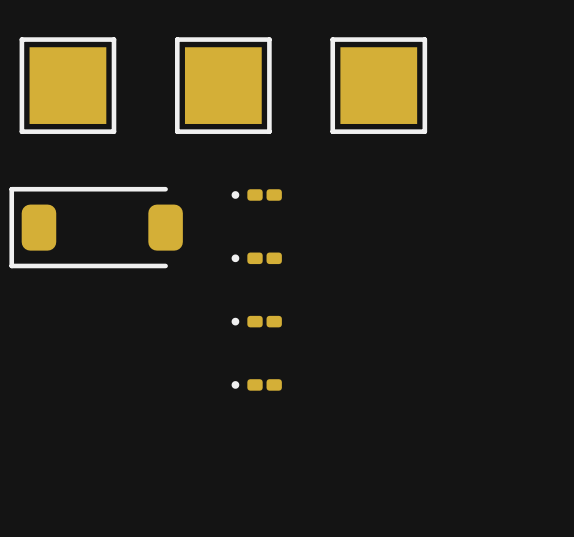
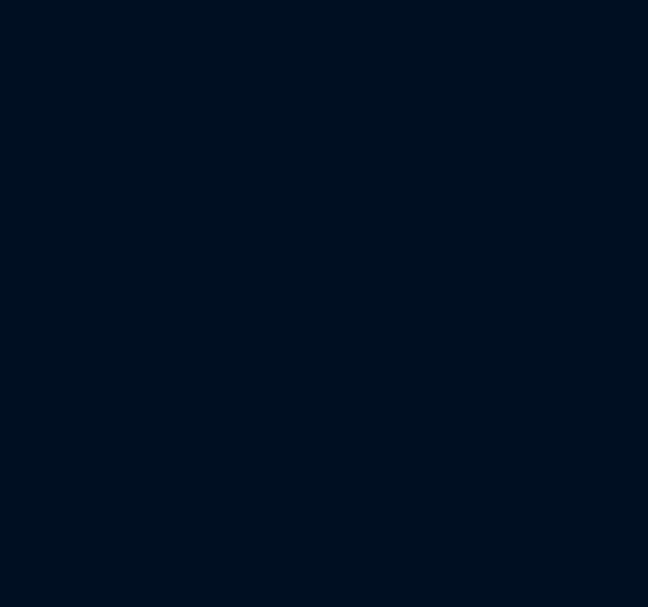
part: (67, 85) -> none
part: (223, 85) -> none
part: (378, 85) -> none
part: (256, 194) -> none
part: (96, 227) -> none
part: (256, 258) -> none
part: (256, 321) -> none
part: (256, 384) -> none

